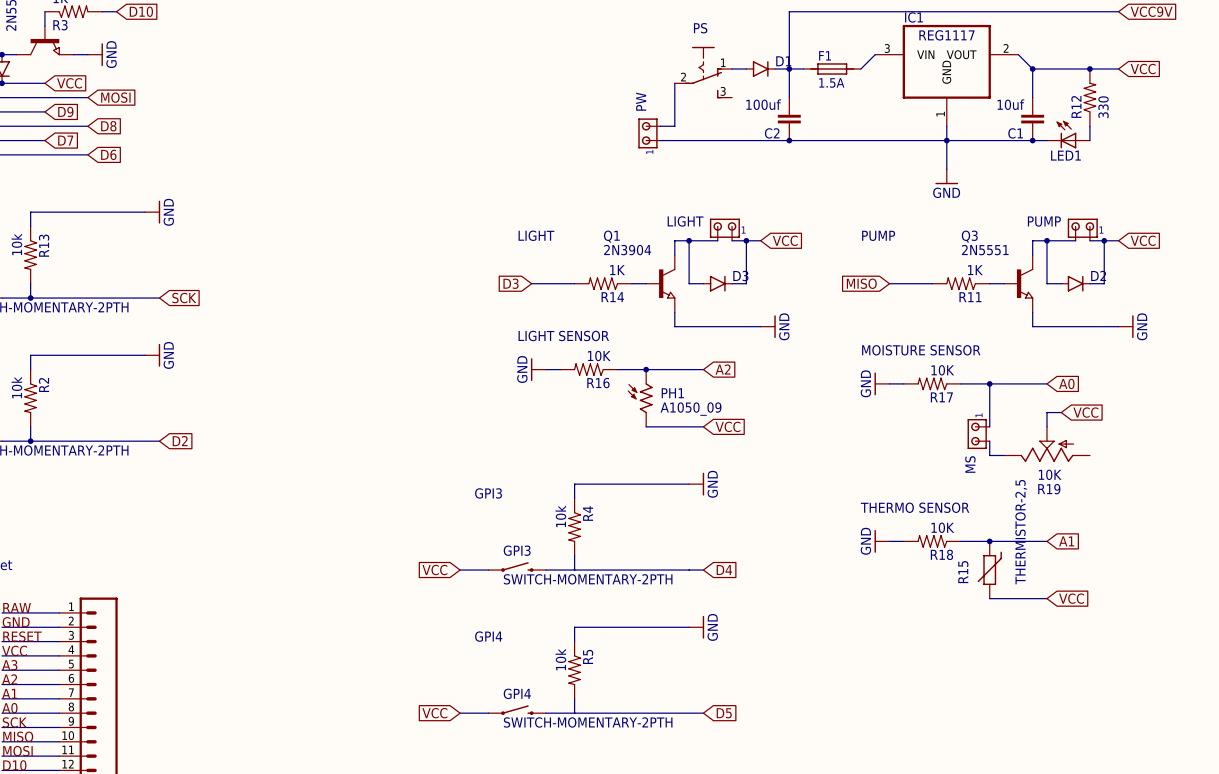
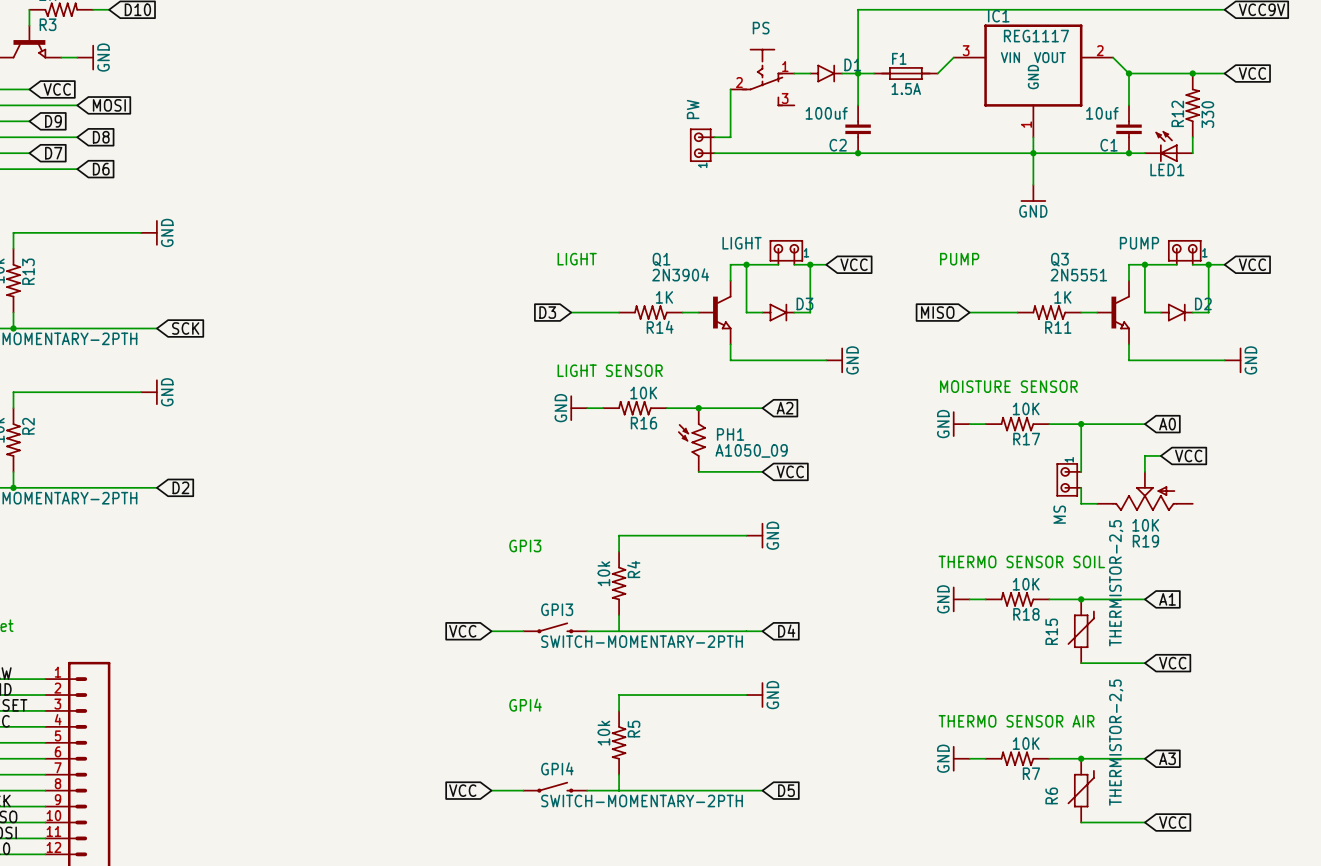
text: THERMO SENSOR (915, 507) -> THERMO SENSOR SOIL (1021, 561)
text: none -> THERMO SENSOR AIR (1016, 721)
power symbol: none -> GND (961, 758)
wire: none -> (969, 758) (985, 758)
R7: none -> 10K (1017, 758)
wire: none -> (1049, 758) (1144, 758)
junction: none -> (1081, 758)
global label: none -> A3 (1167, 758)
R6: none -> THERMISTOR-2,5 (1081, 790)
wire: none -> (1081, 822) (1144, 822)
global label: none -> VCC (1172, 822)

